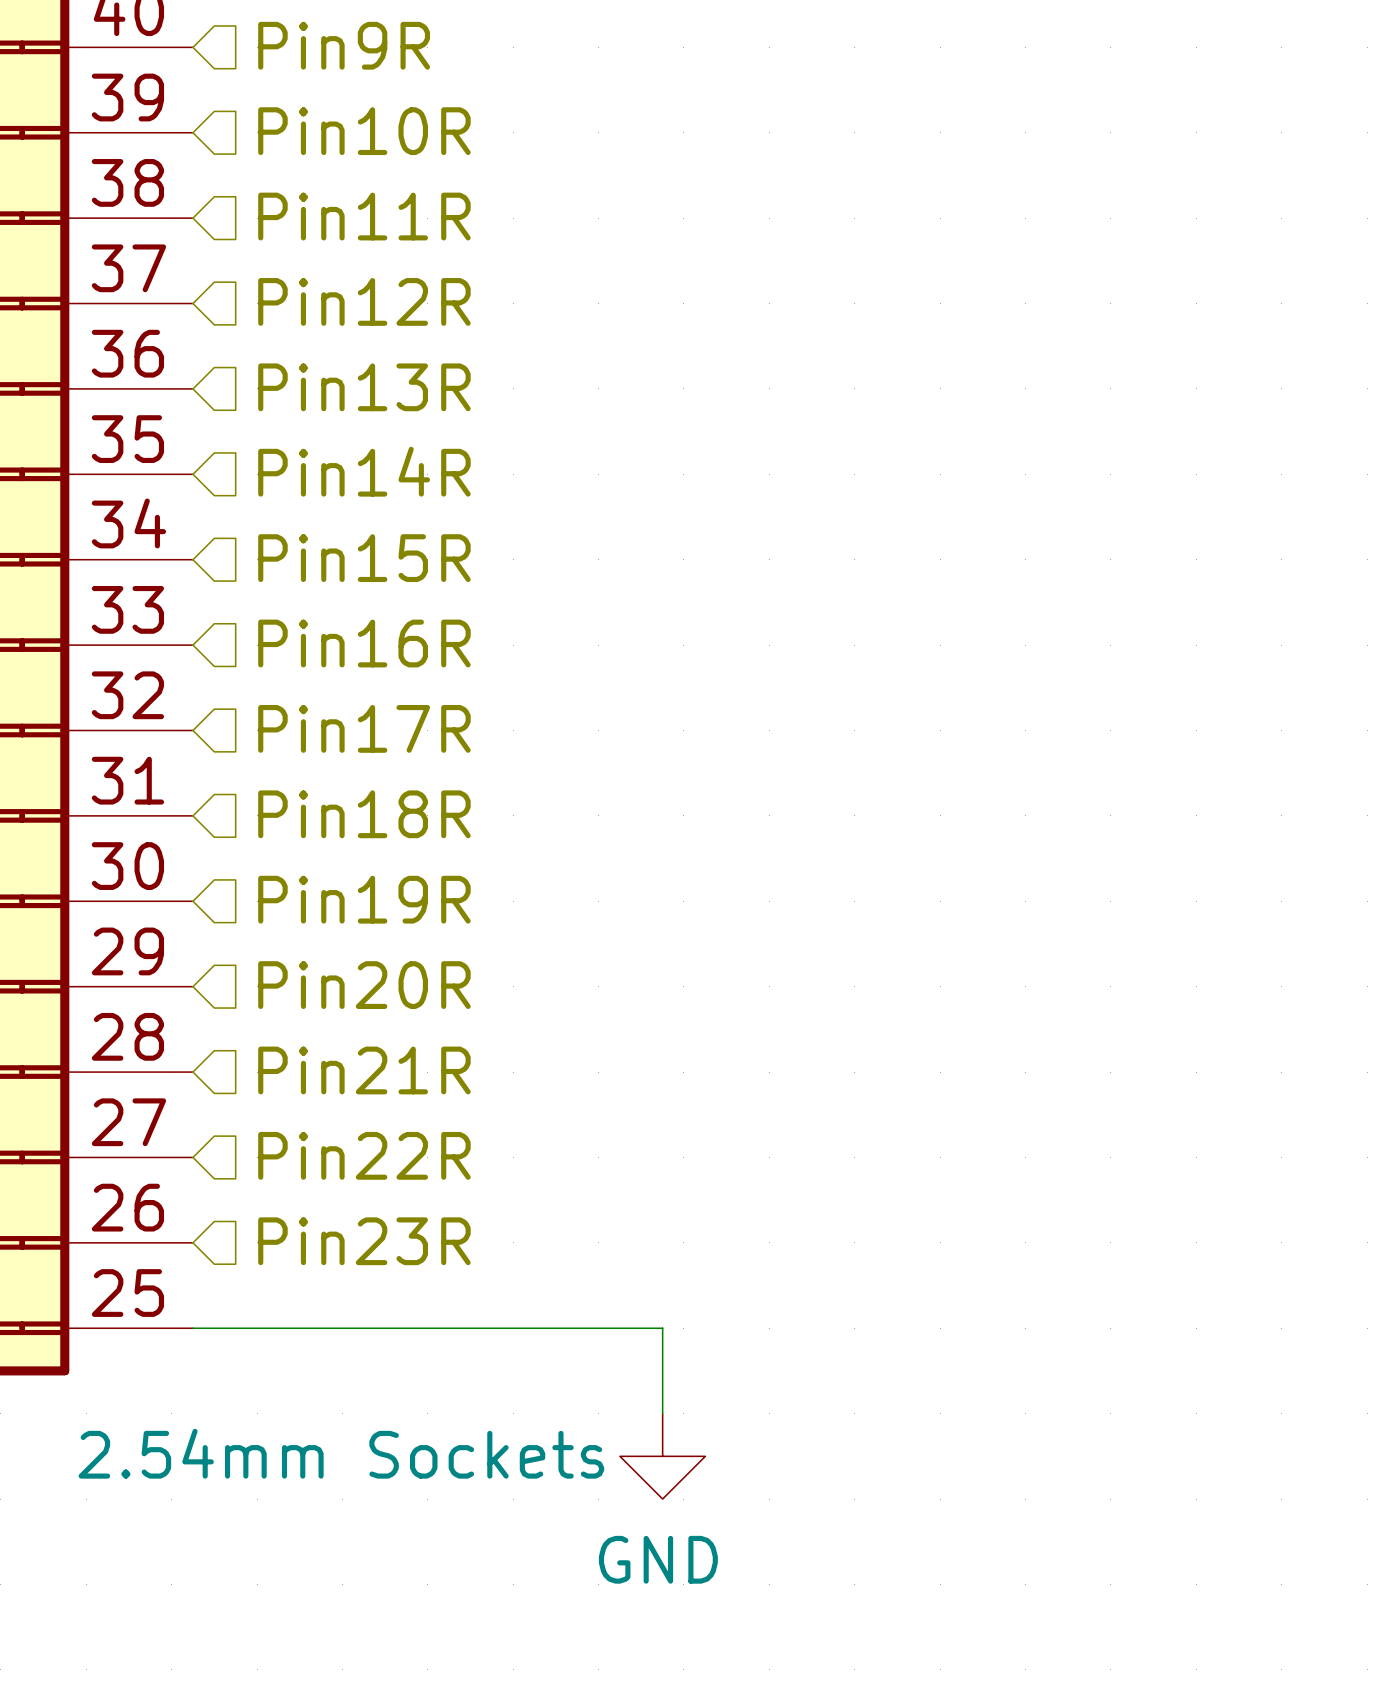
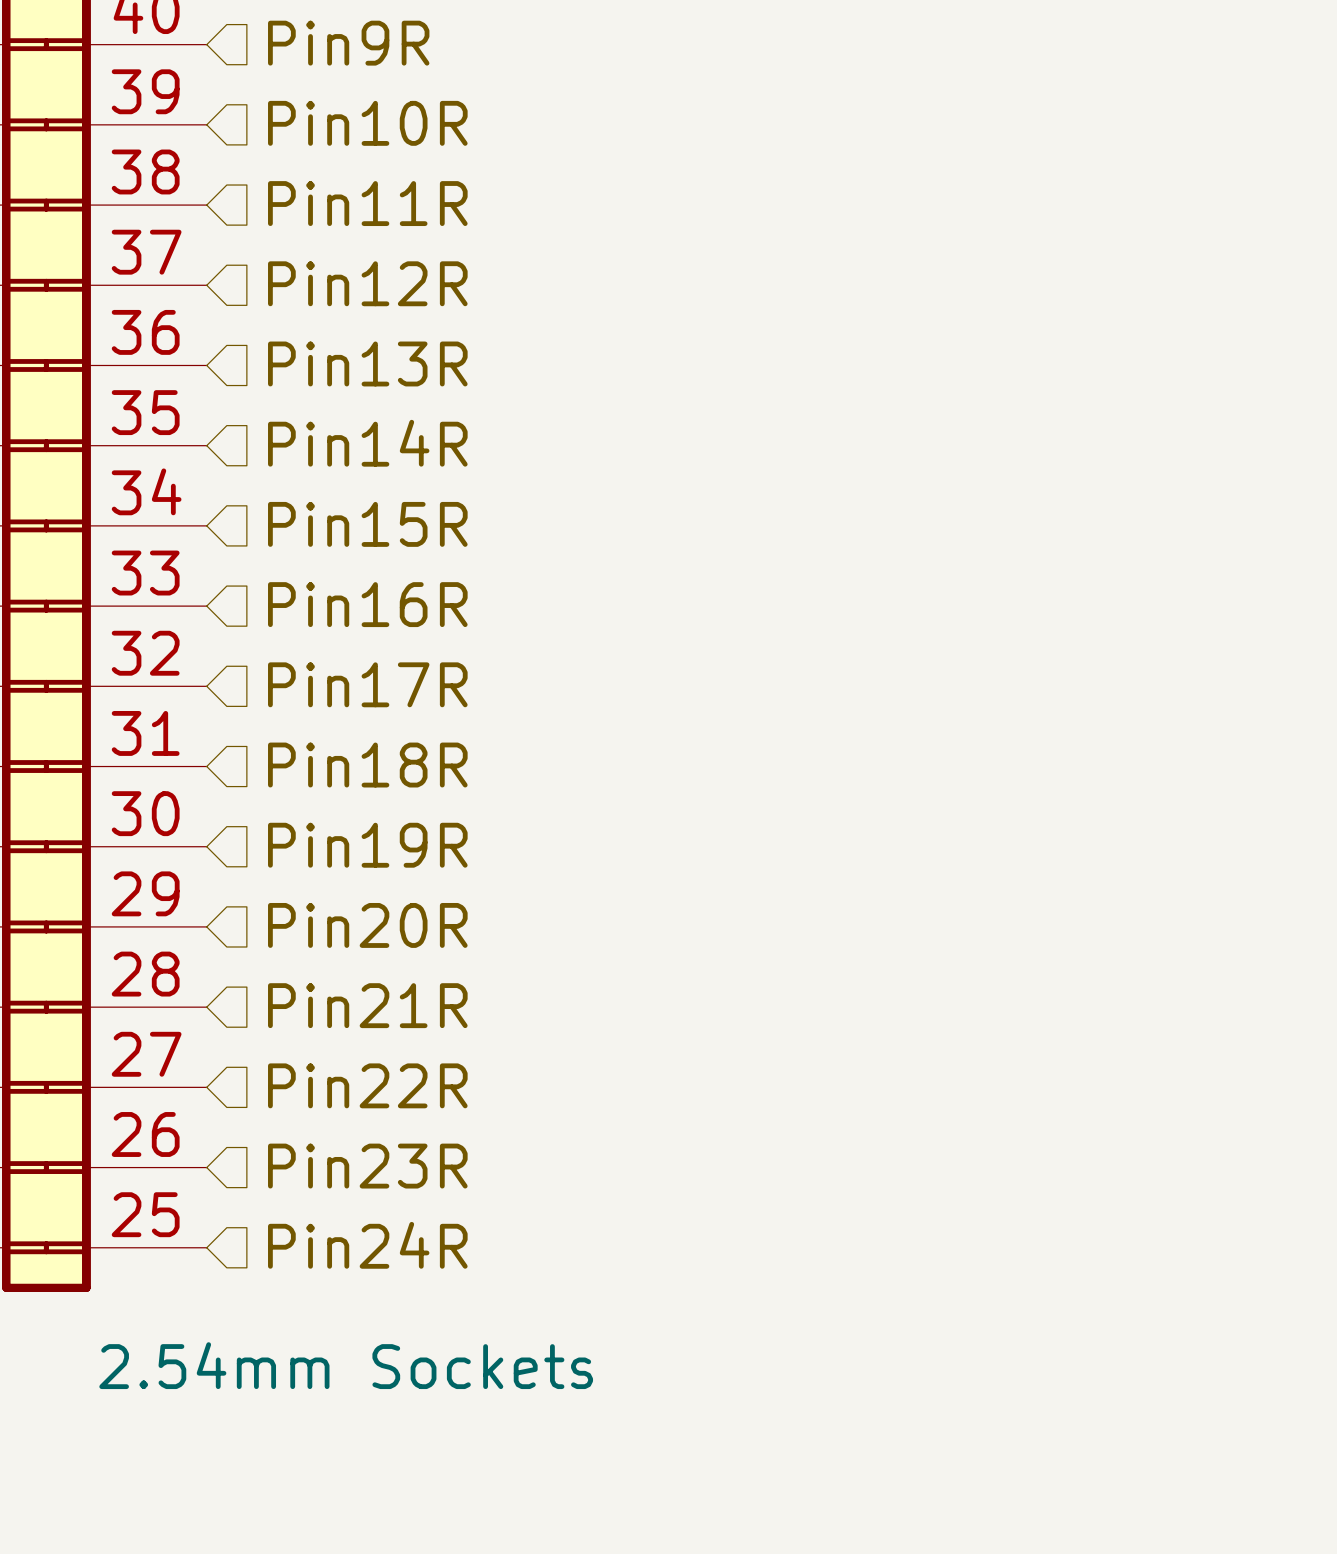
hierarchical label: none -> Pin24R (367, 1245)
wire: (192, 1328) (662, 1328) (662, 1413) -> none
power symbol: GND (662, 1456) -> none

